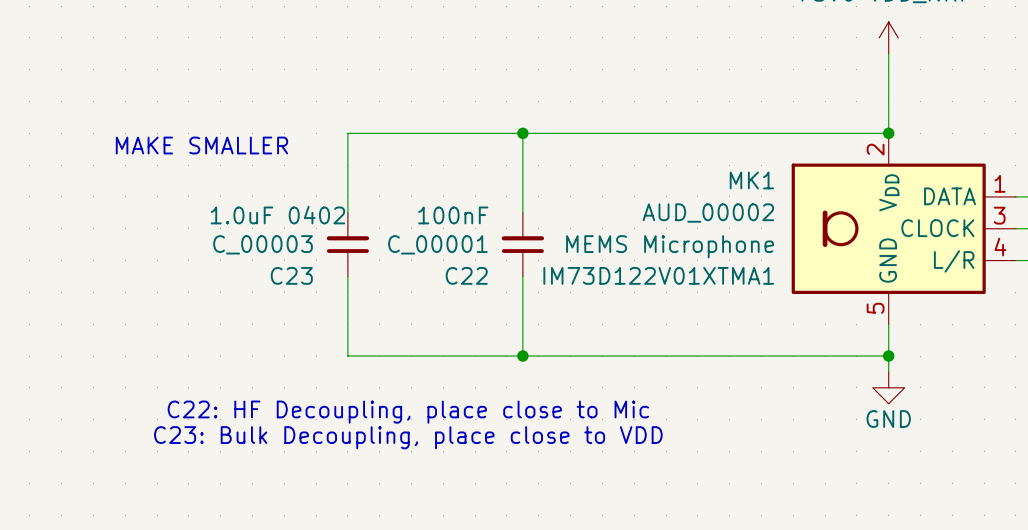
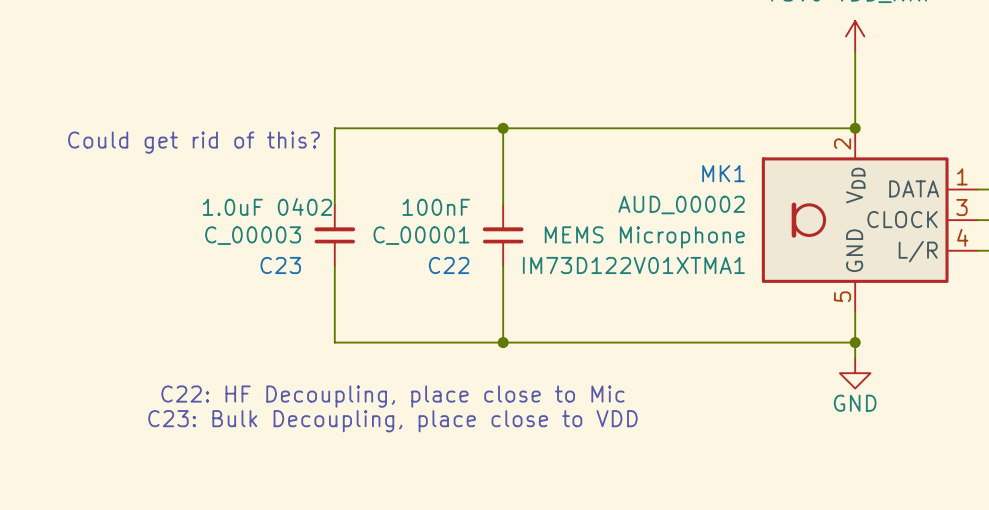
text: MAKE SMALLER (201, 145) -> Could get rid of this? (193, 142)

